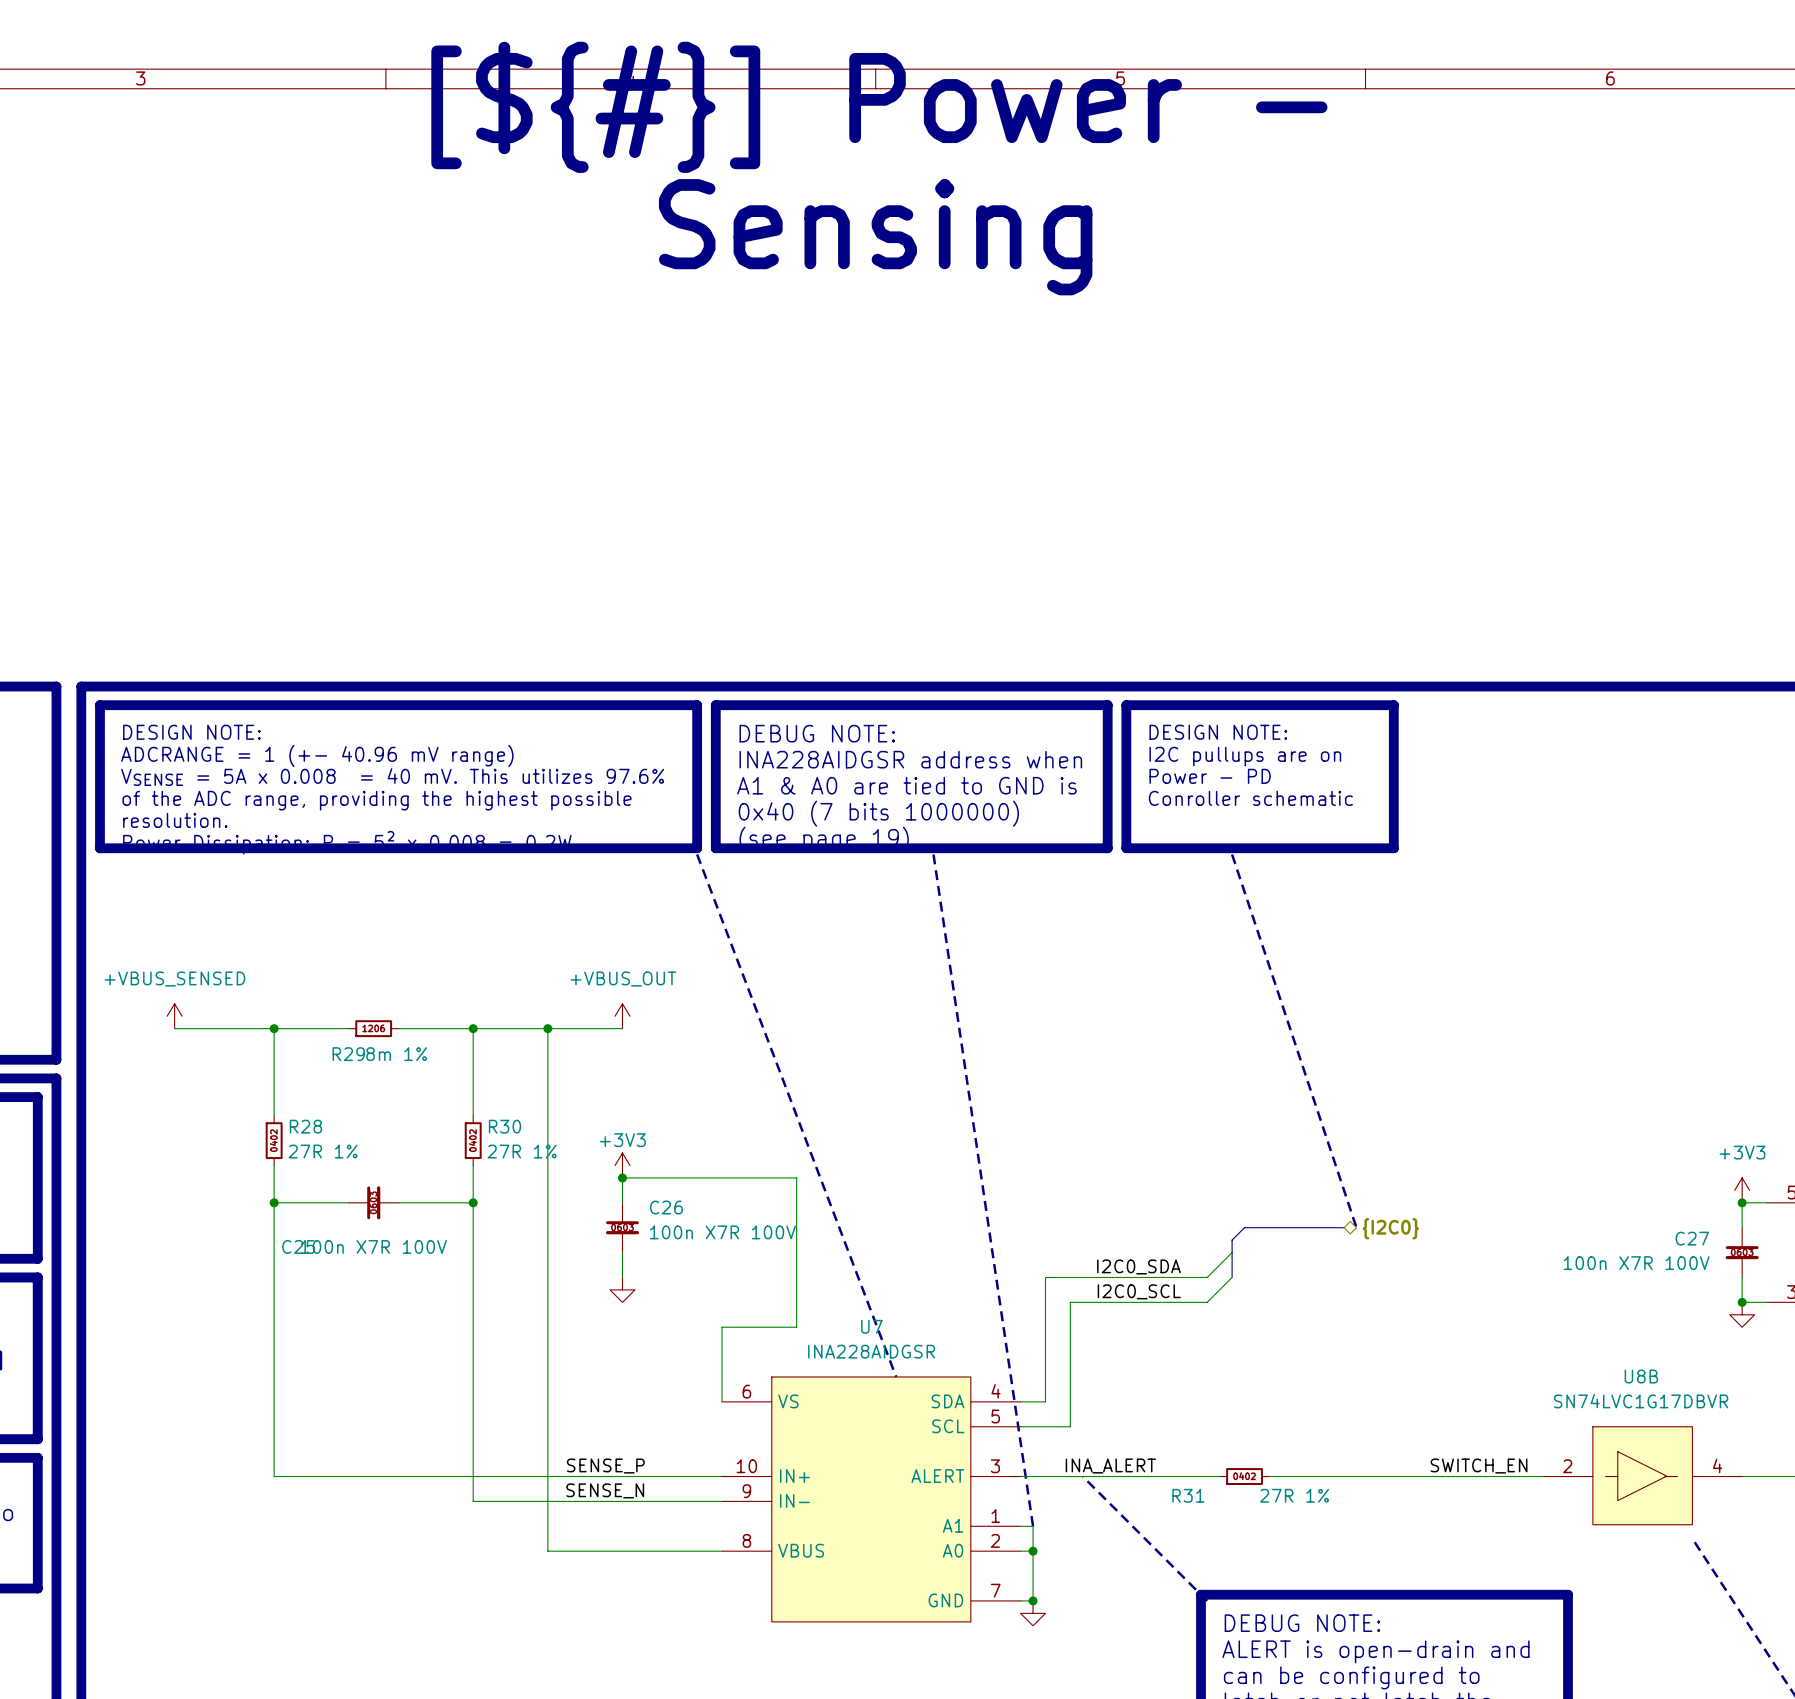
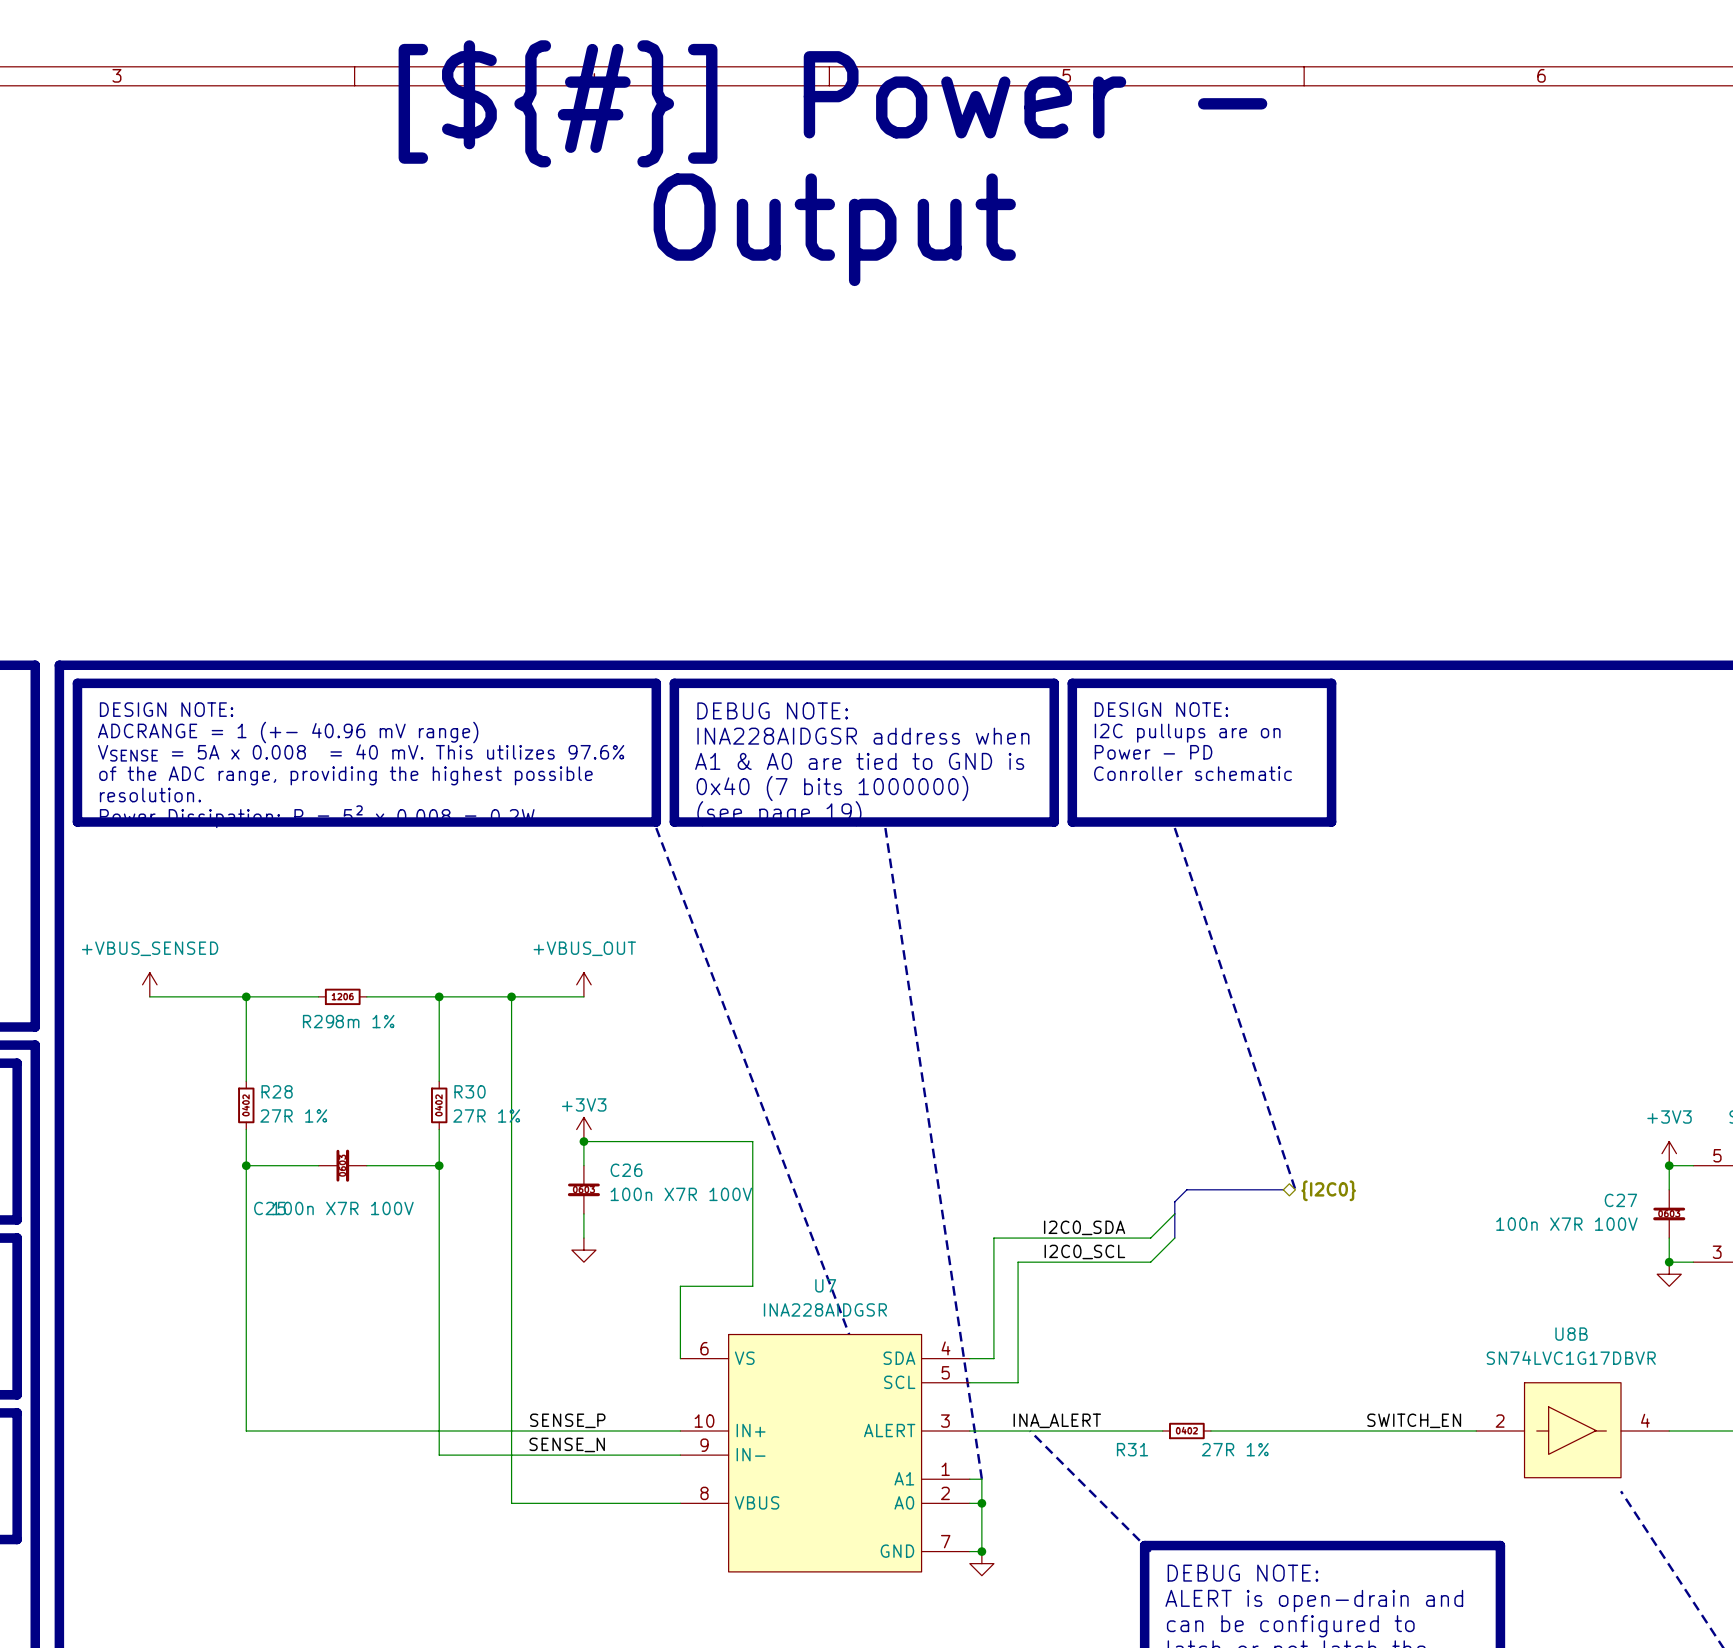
text: Sensing (875, 237) -> Output (834, 229)

